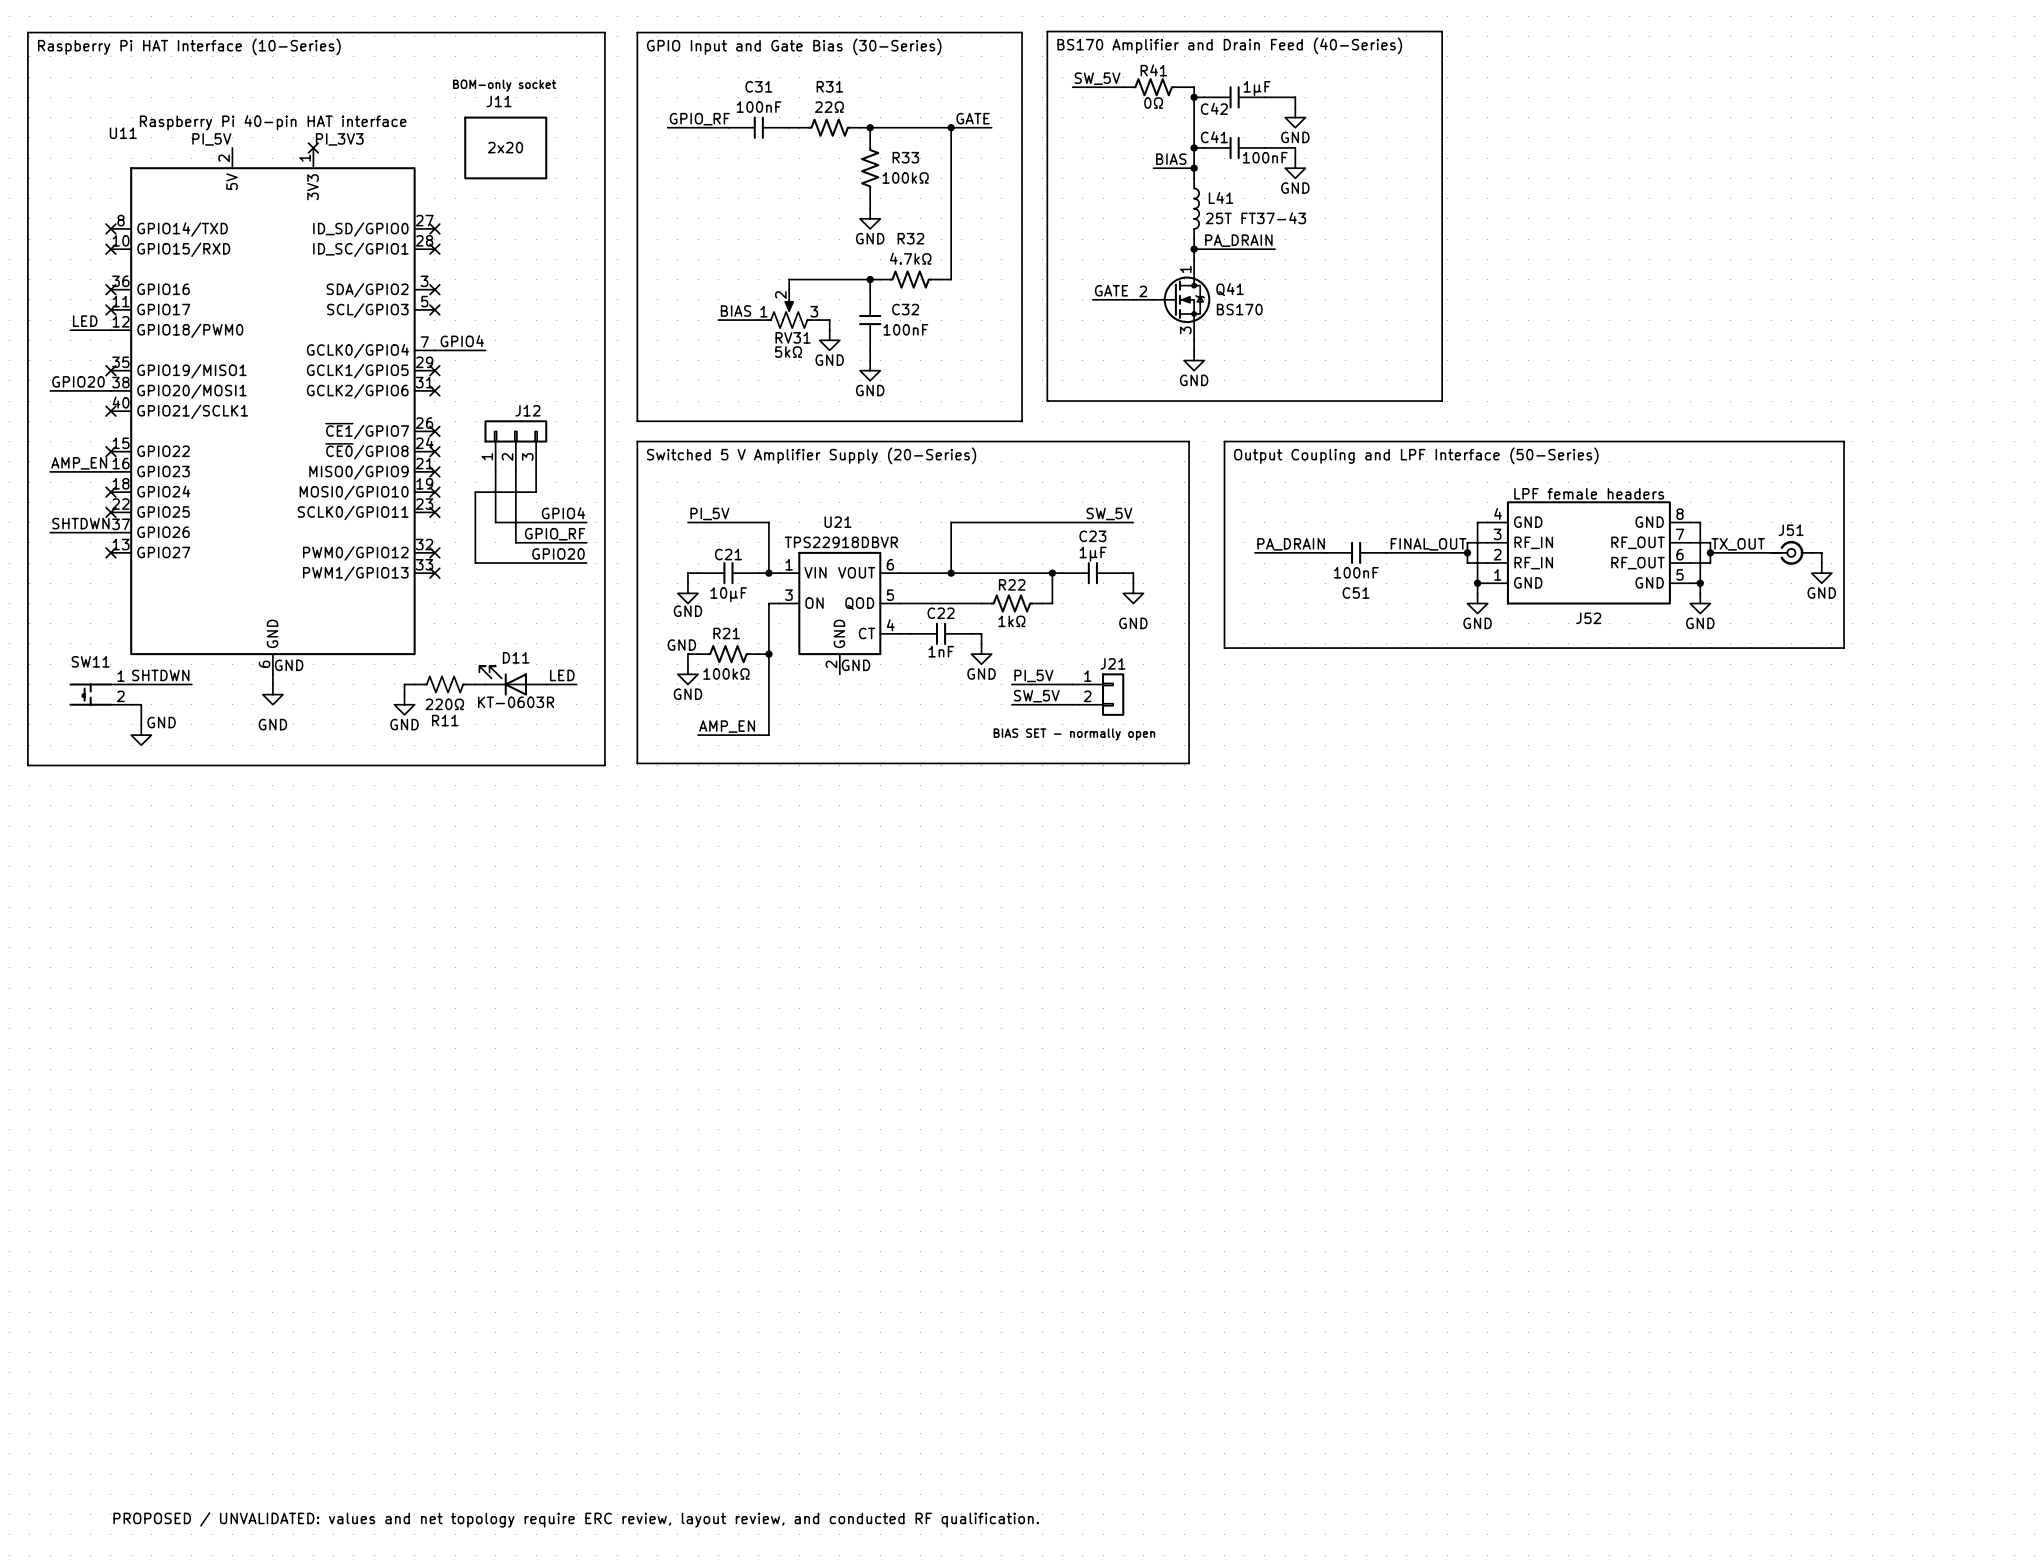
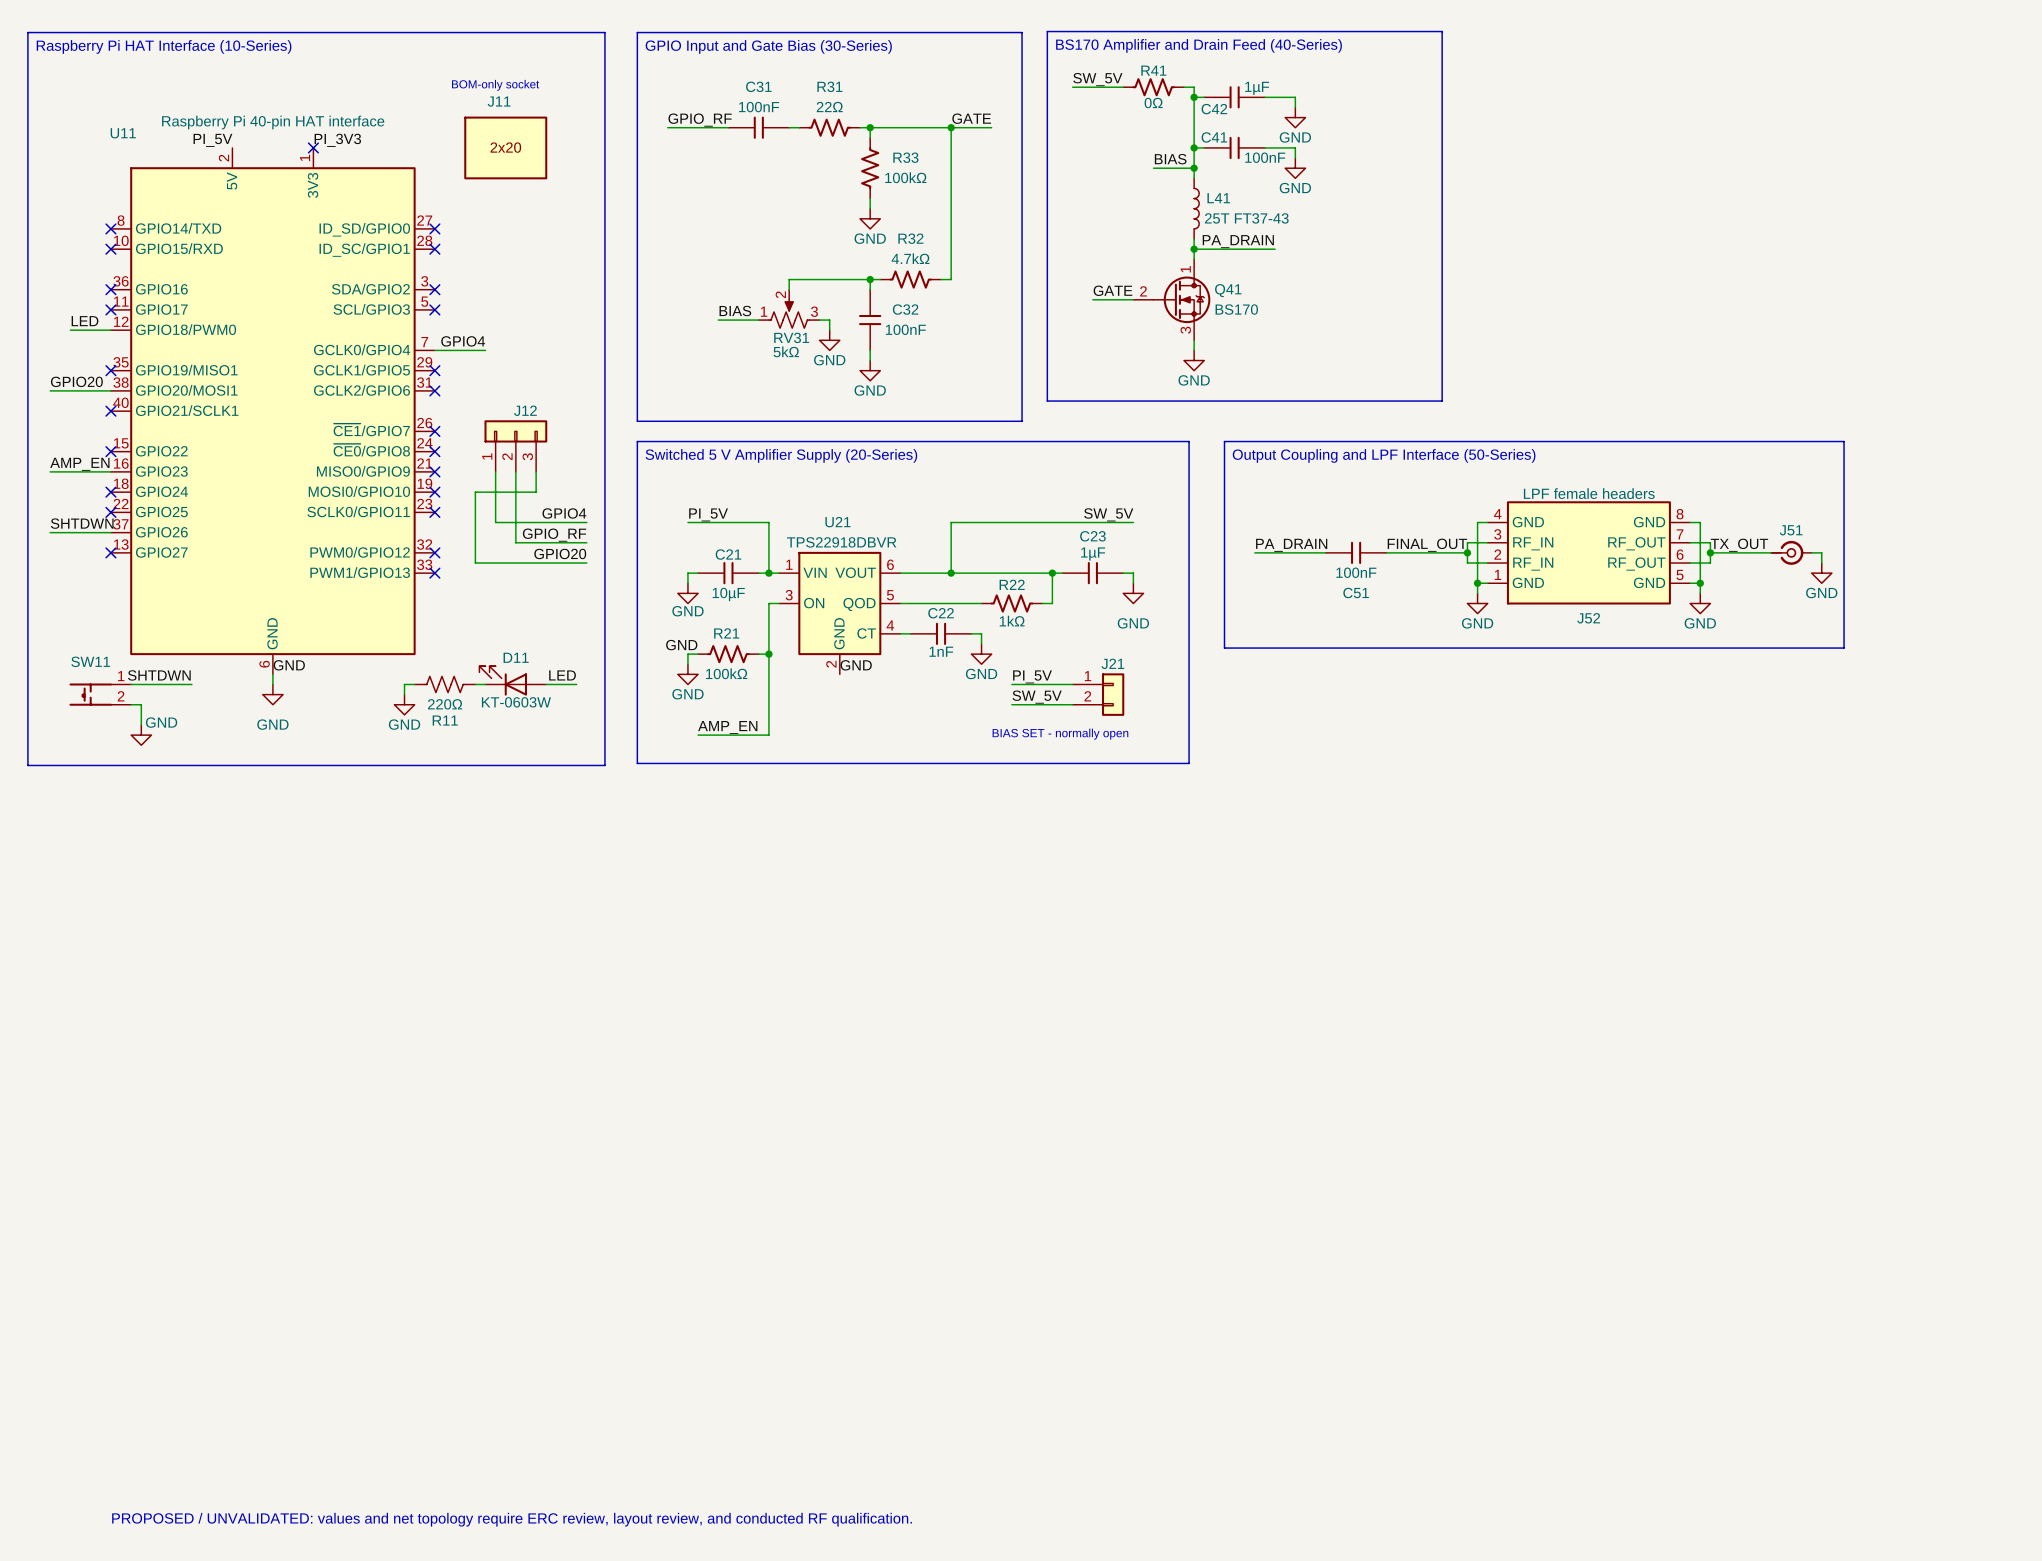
D11 value: KT-0603R (516, 702) -> KT-0603W (516, 702)

